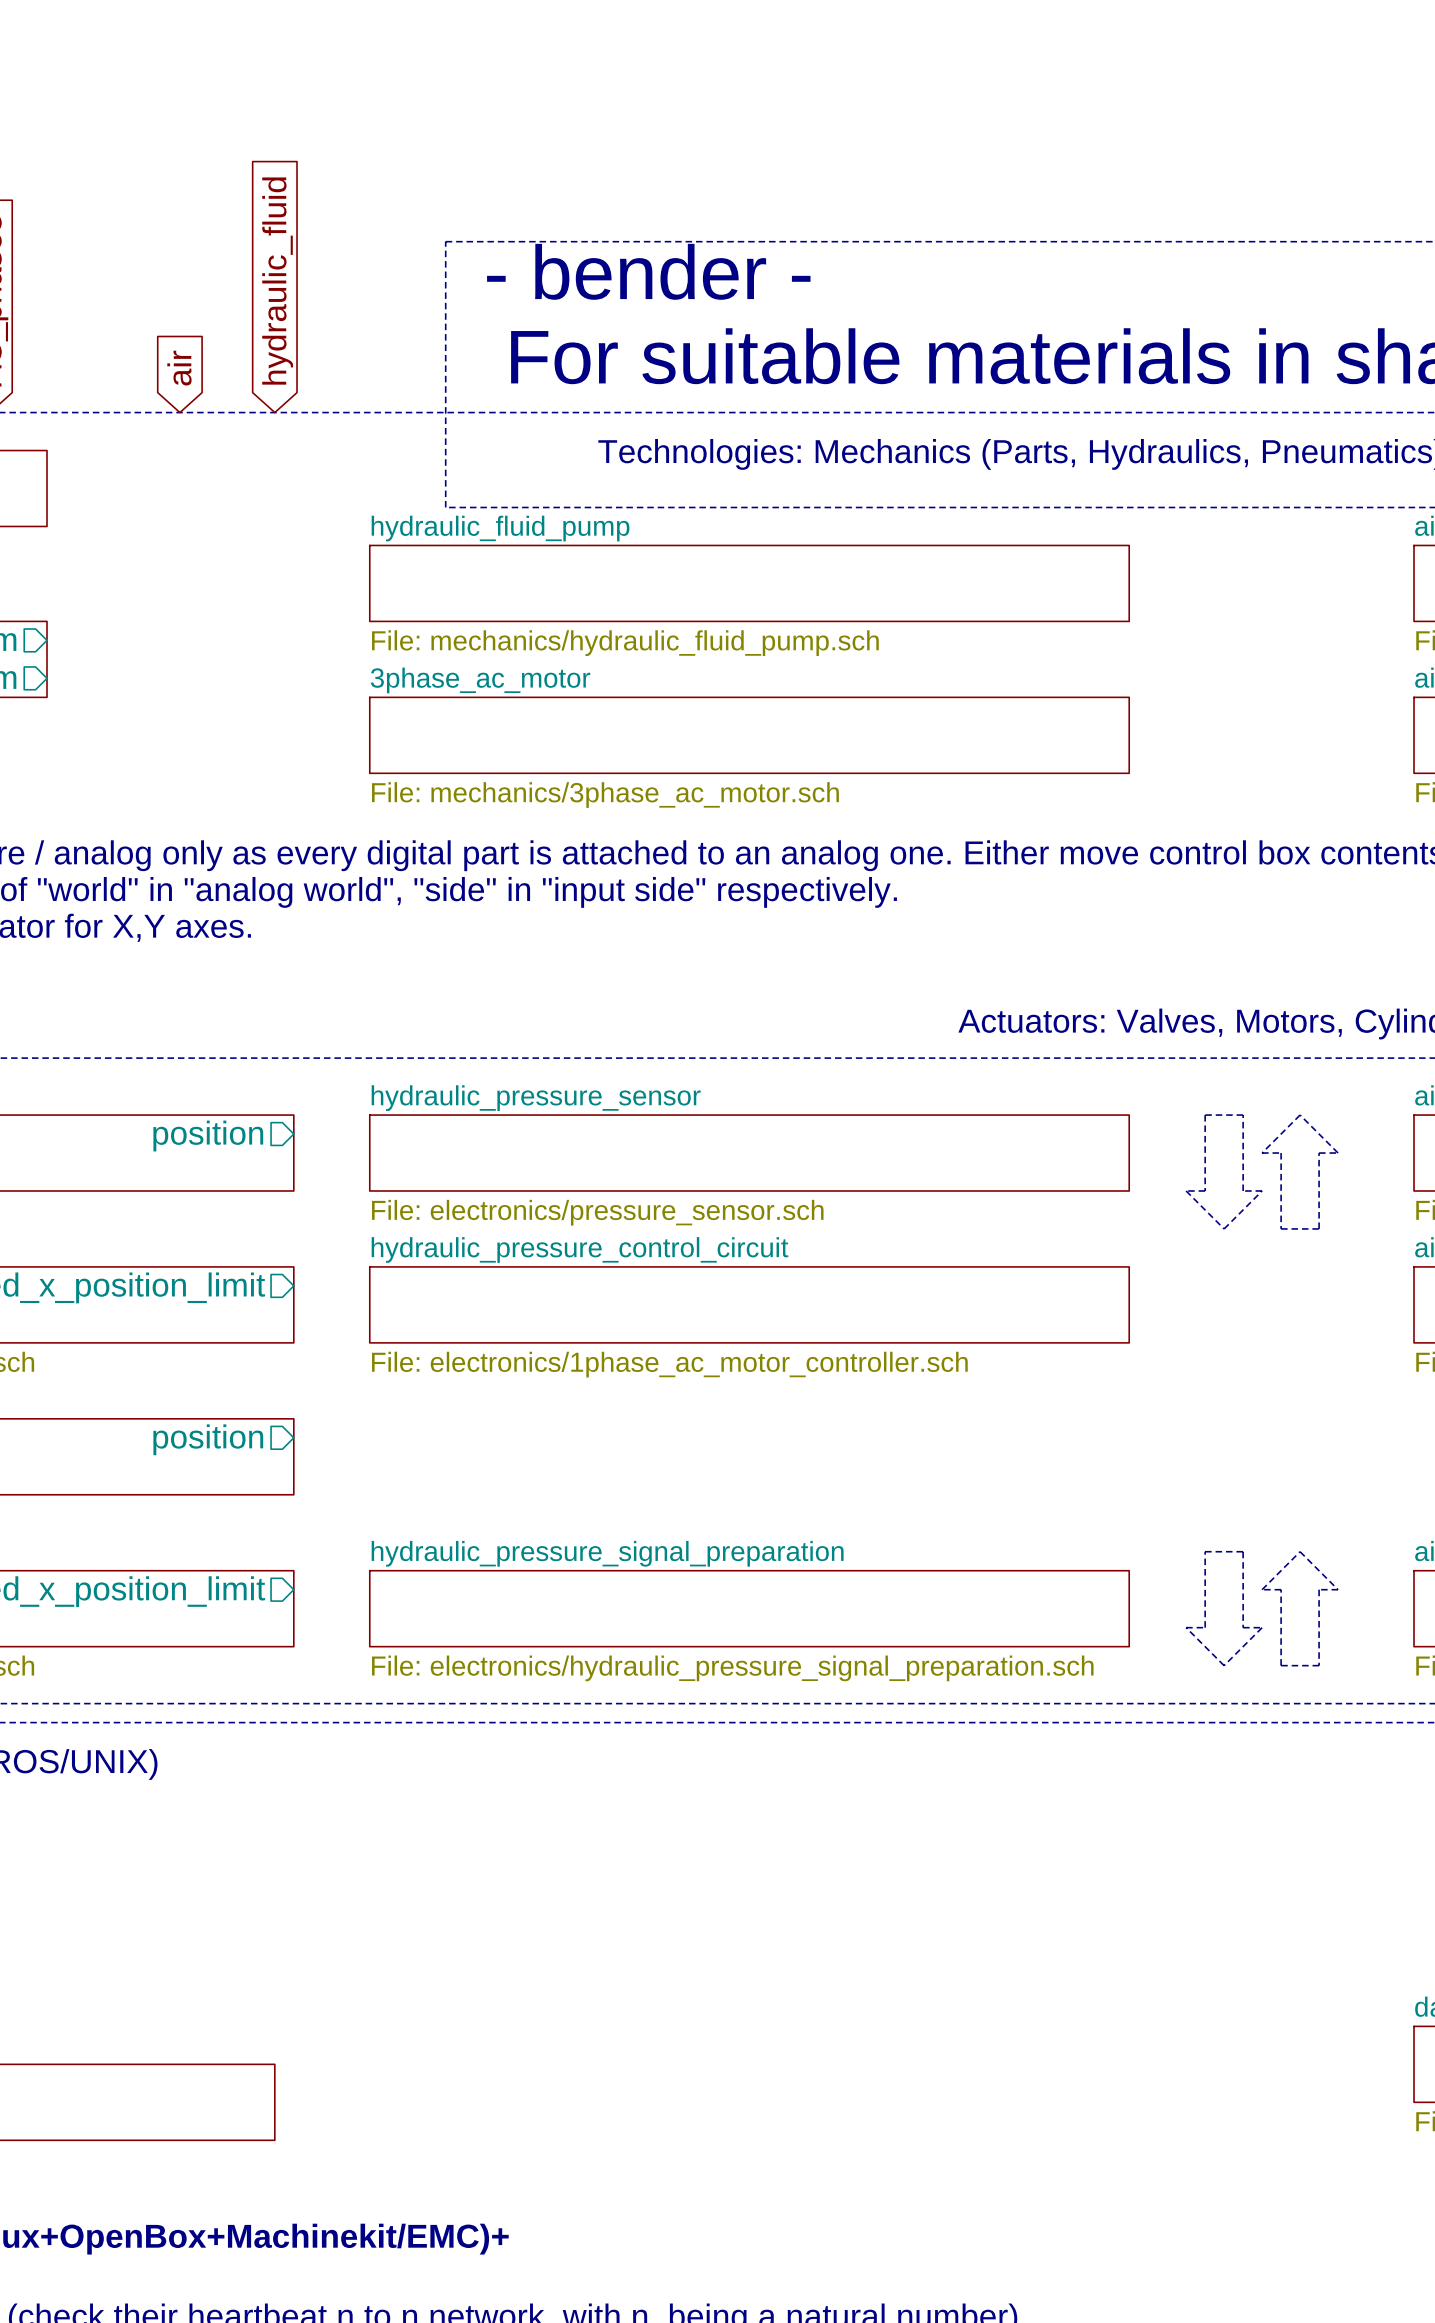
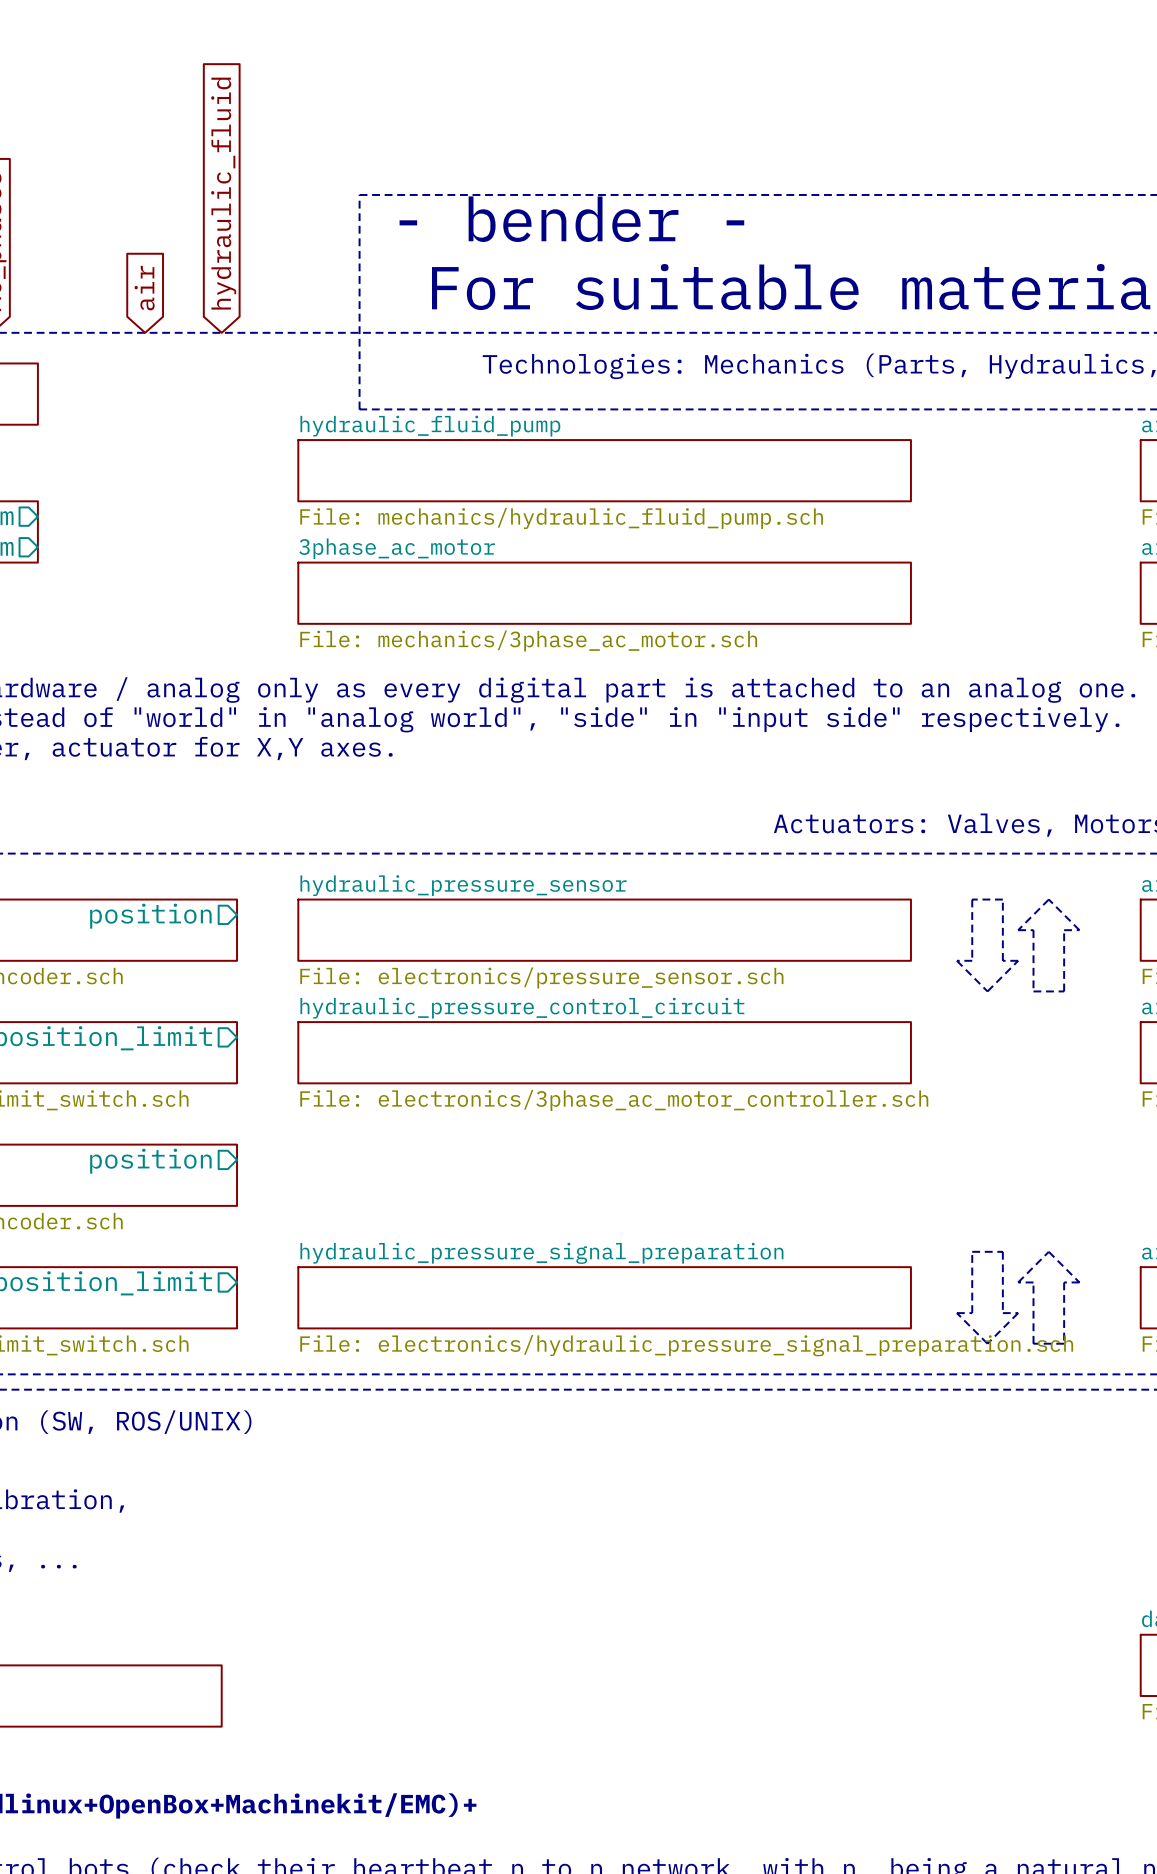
sheet hydraulic_pressure_control_circuit value: File: electronics/1phase_ac_motor_controller.sch (669, 1364) -> File: electronics/3phase_ac_motor_controller.sch (614, 1100)

